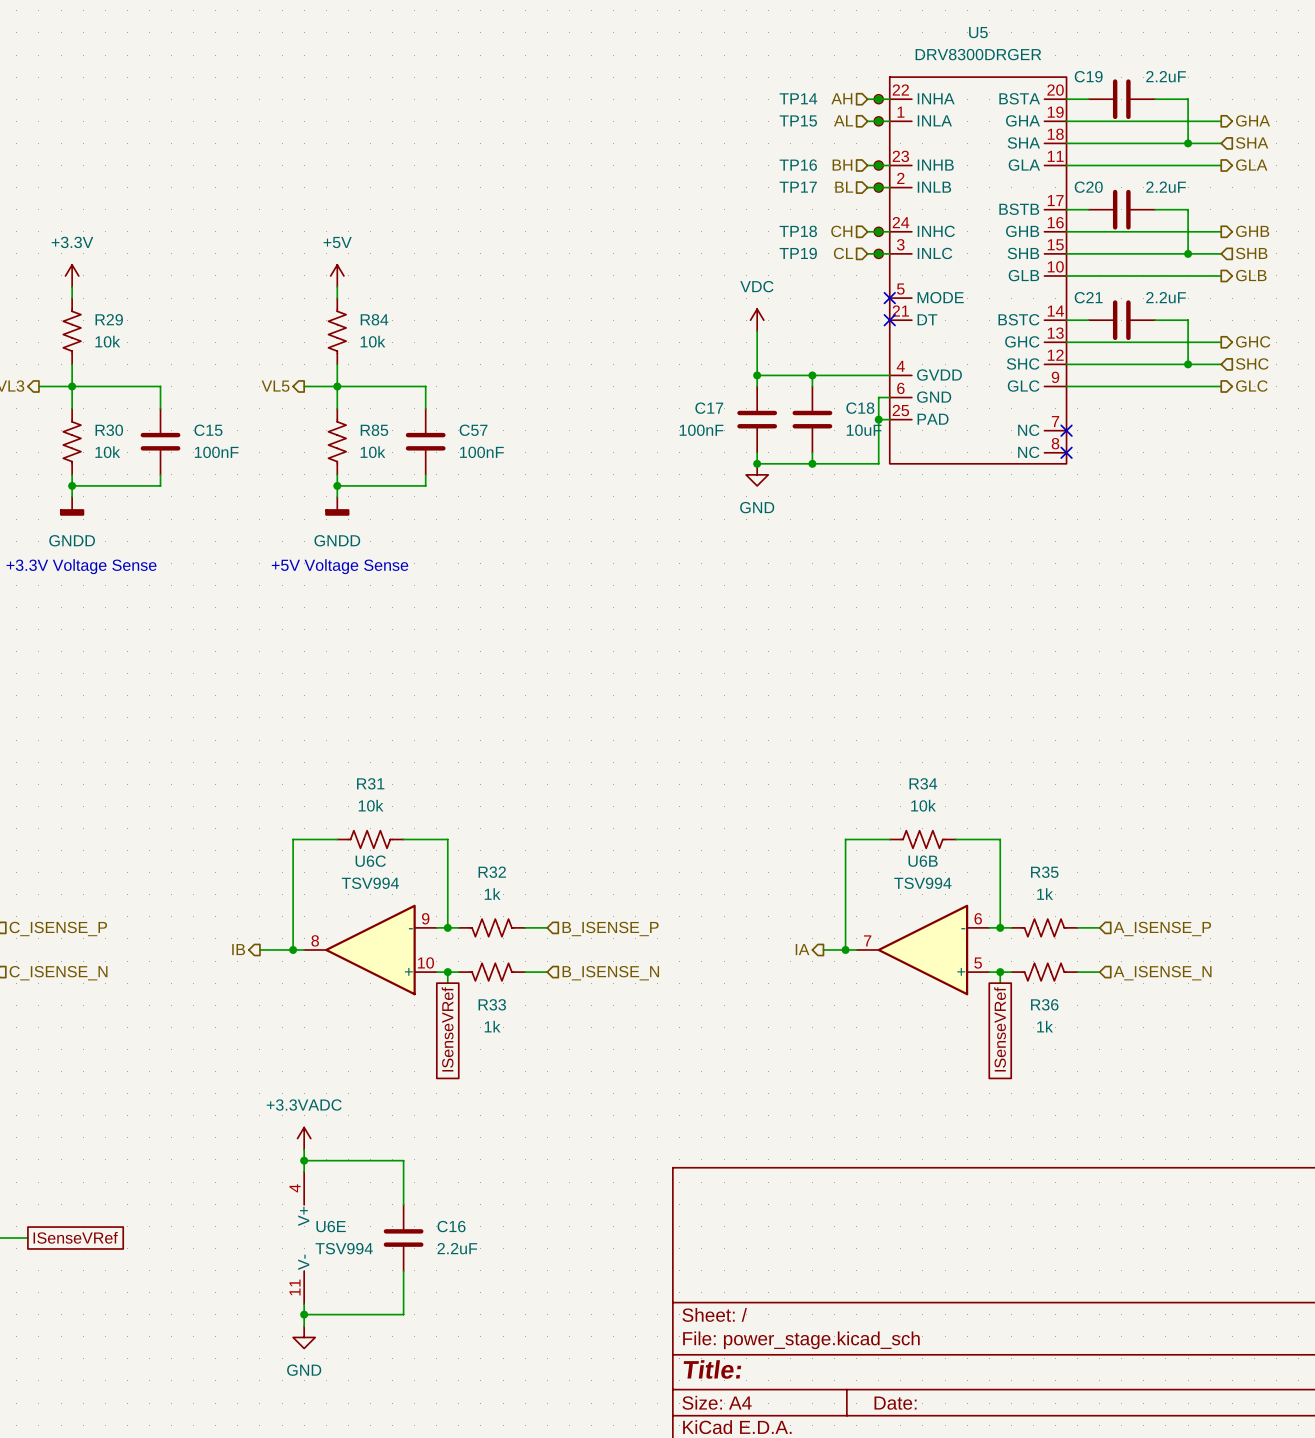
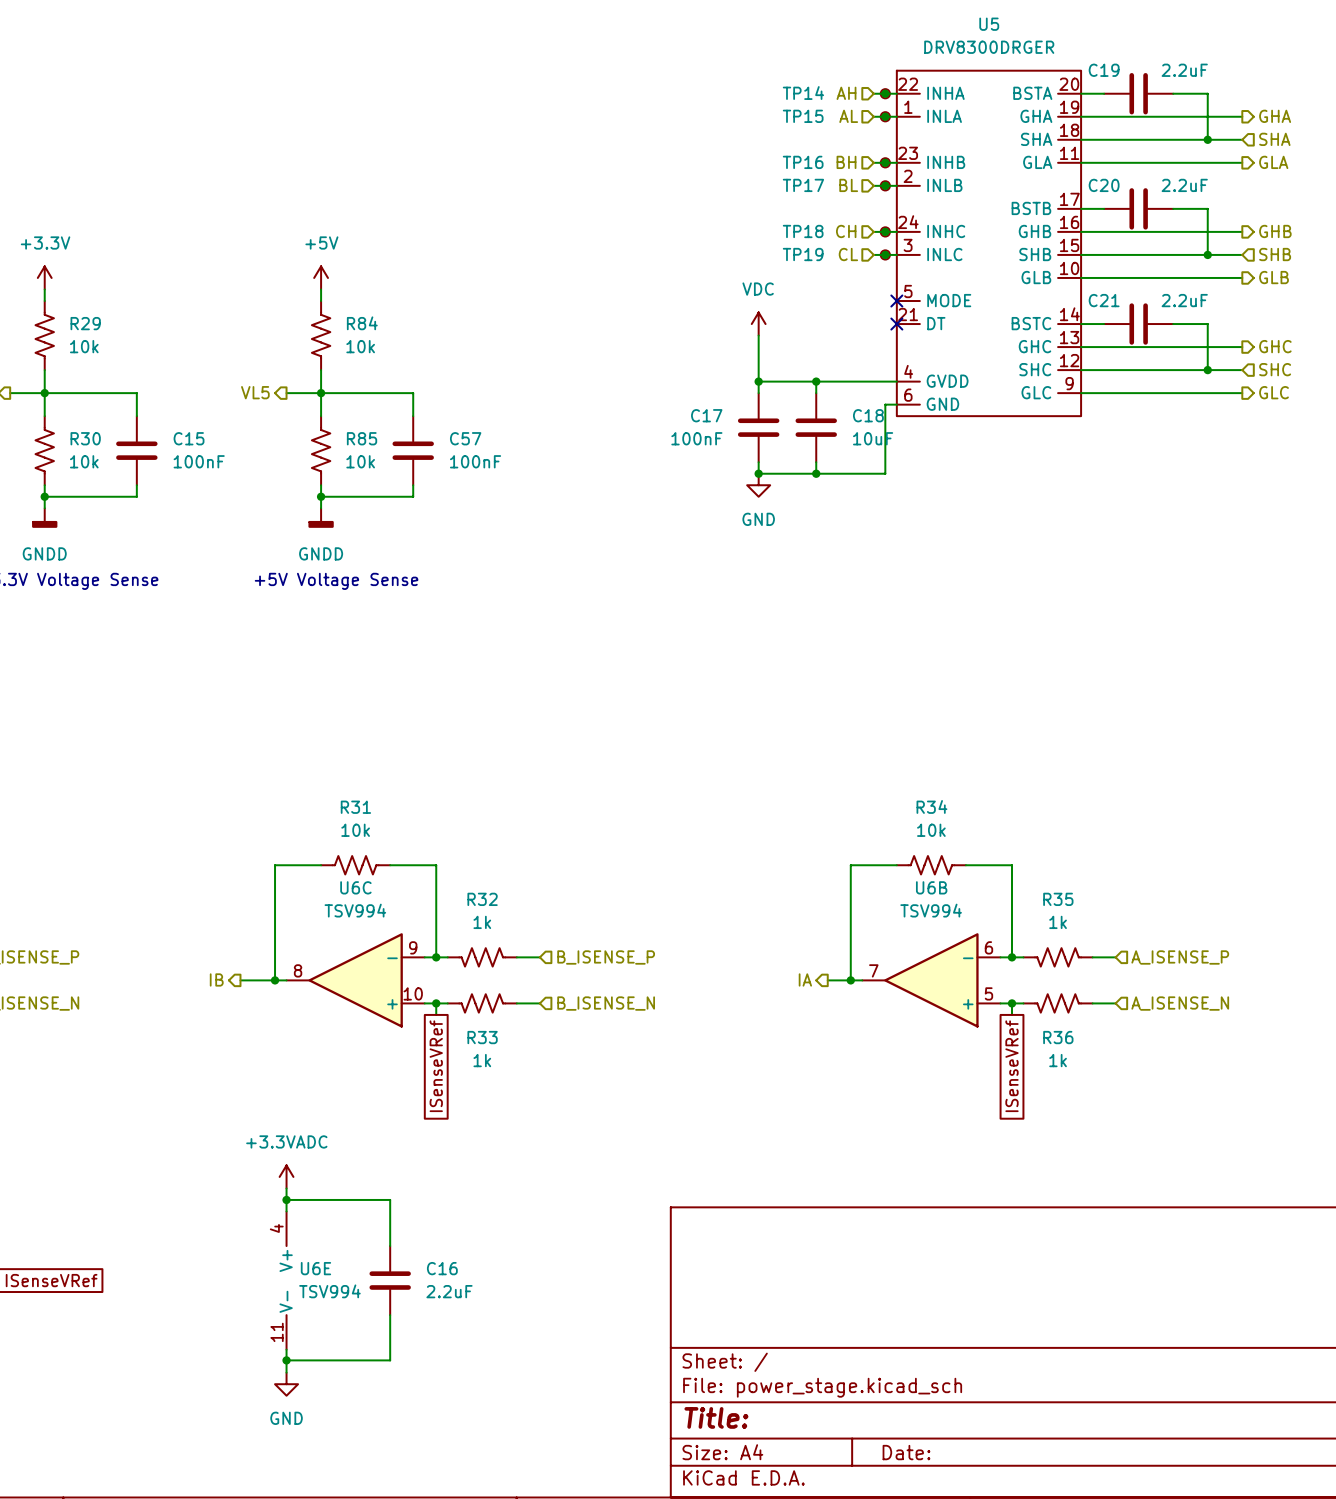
U5 symbol: [889, 77, 1067, 464] -> [896, 70, 1082, 417]
wire: (878, 419) (889, 419) -> none
junction: (878, 419) -> none
no-connect mark: (1066, 430) -> none
no-connect mark: (1066, 452) -> none

